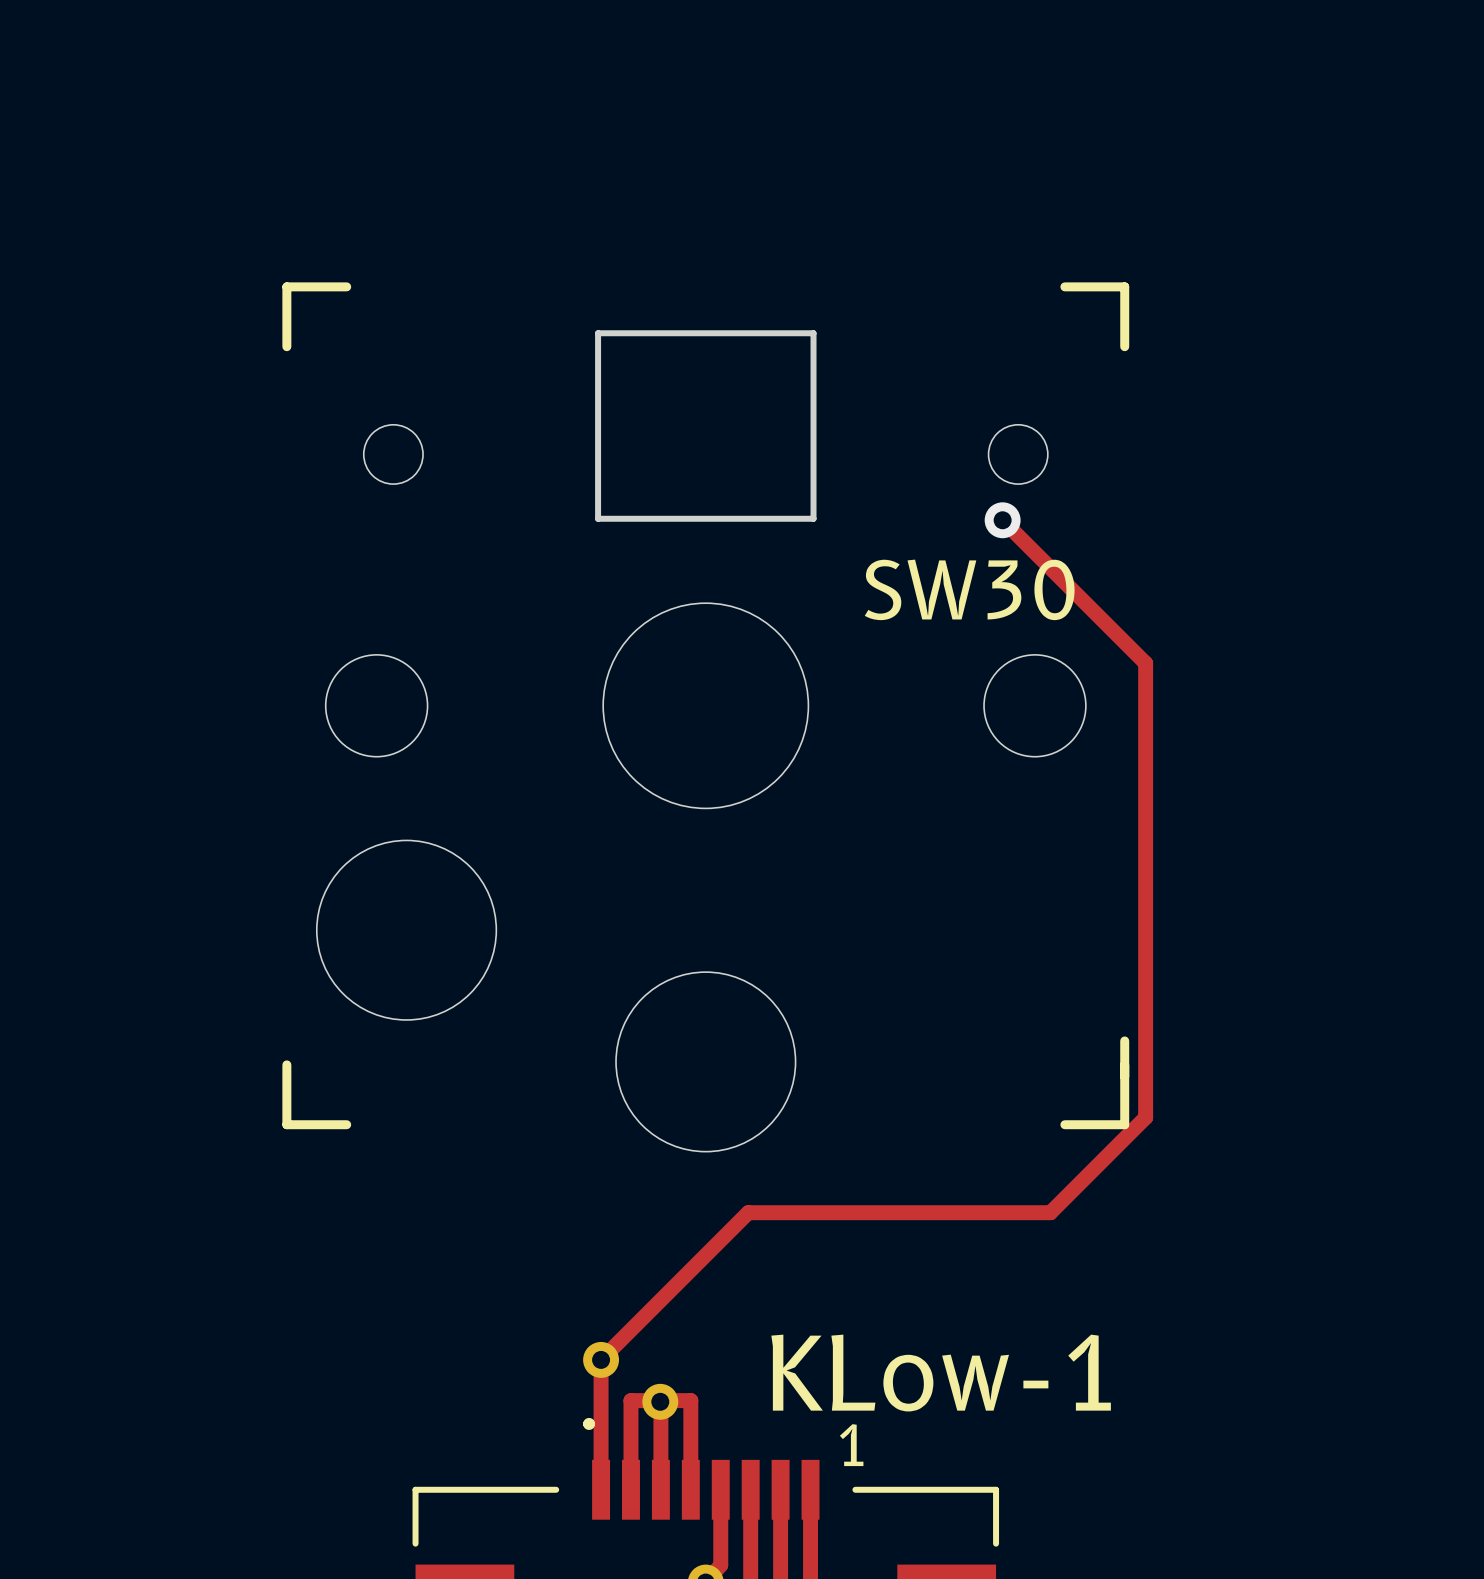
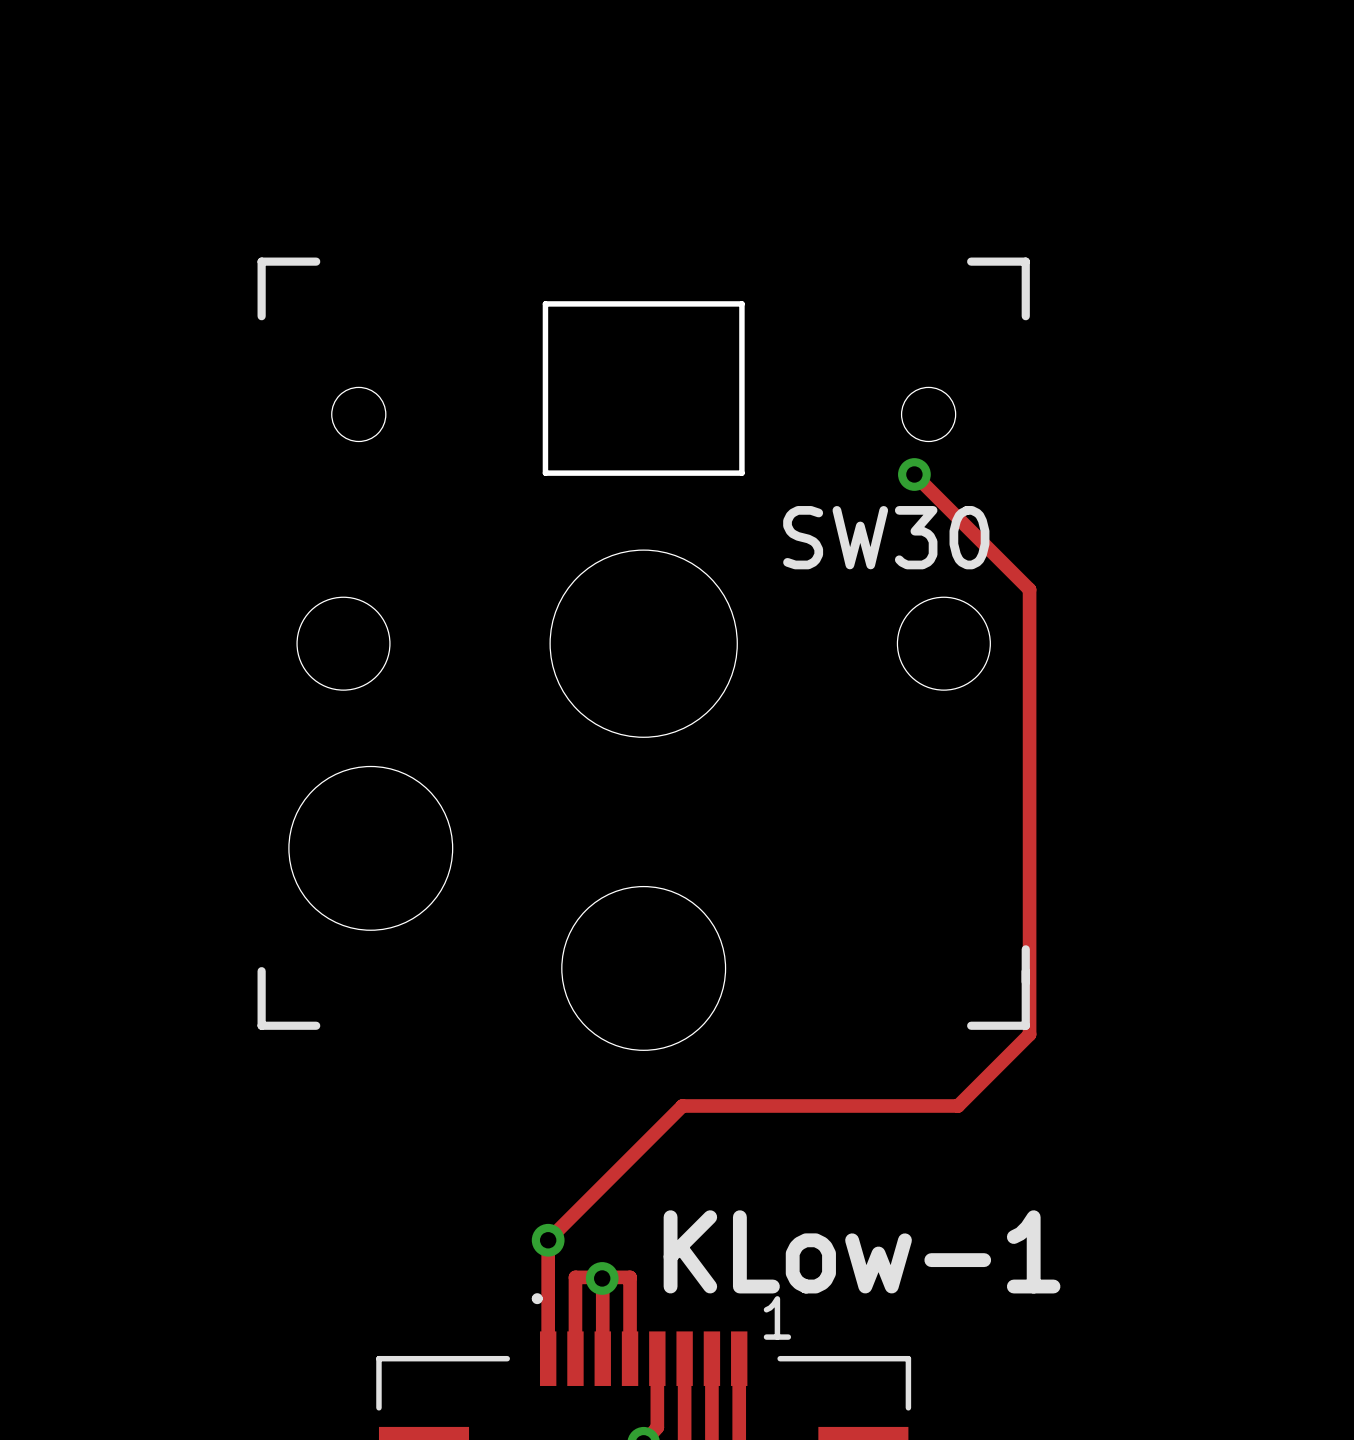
track: (1128, 646) (1145, 663) (1145, 1117) (1128, 1134) -> (1029, 589) (1029, 1034)

